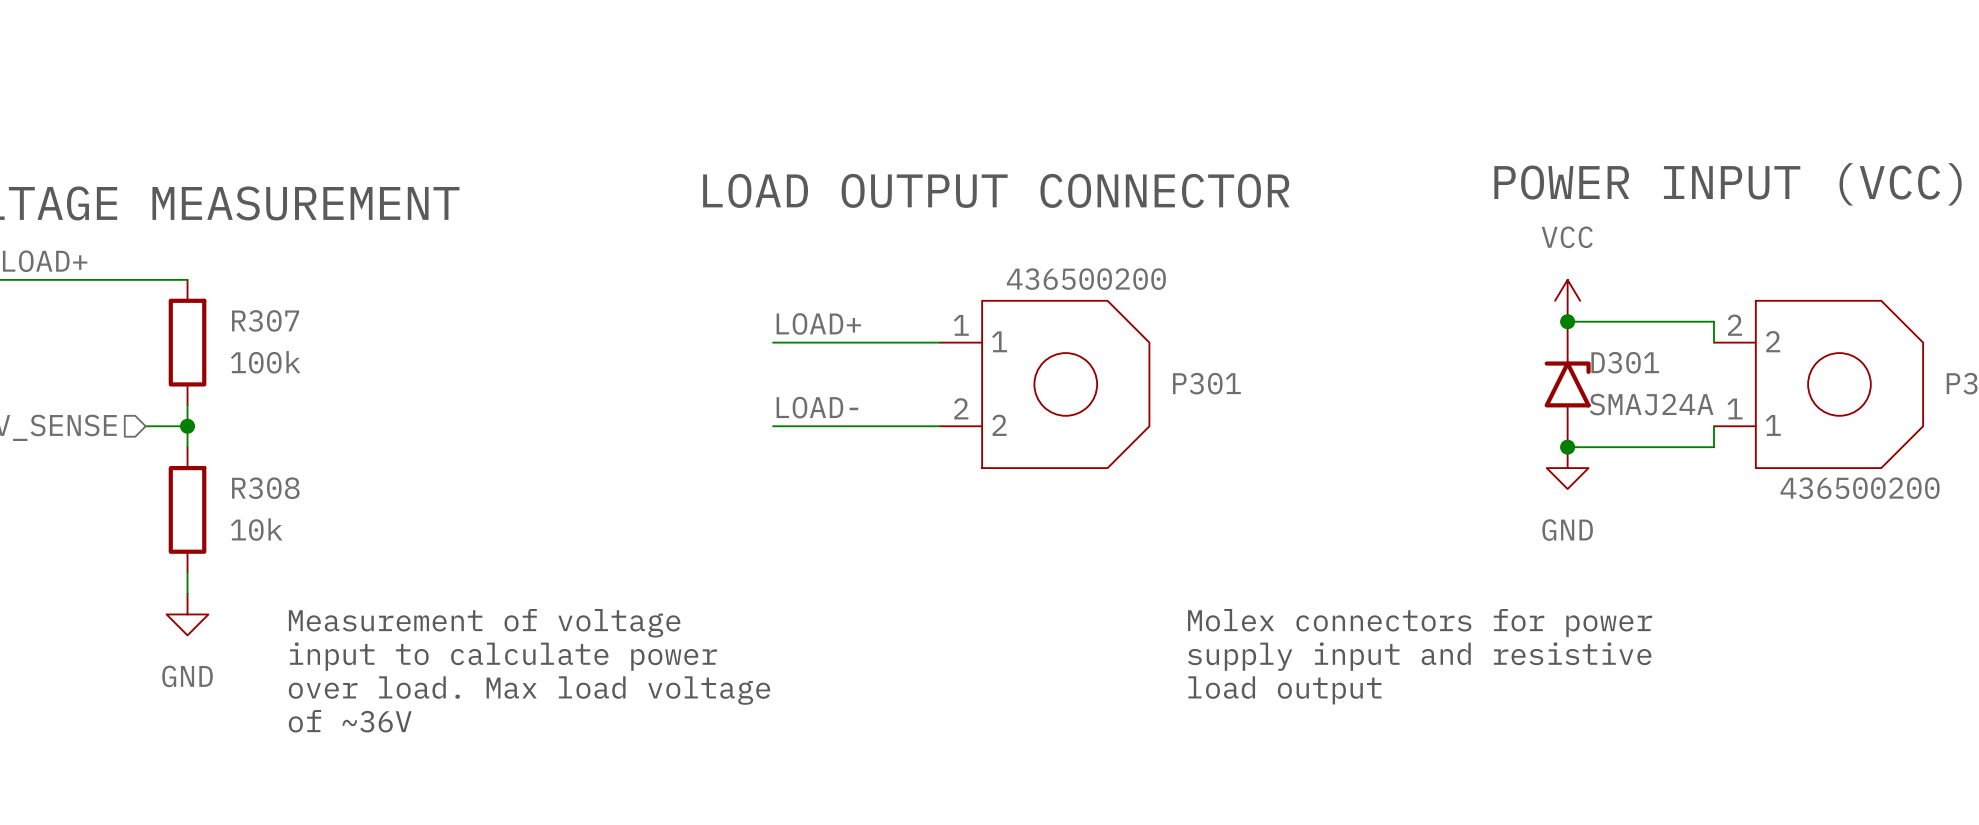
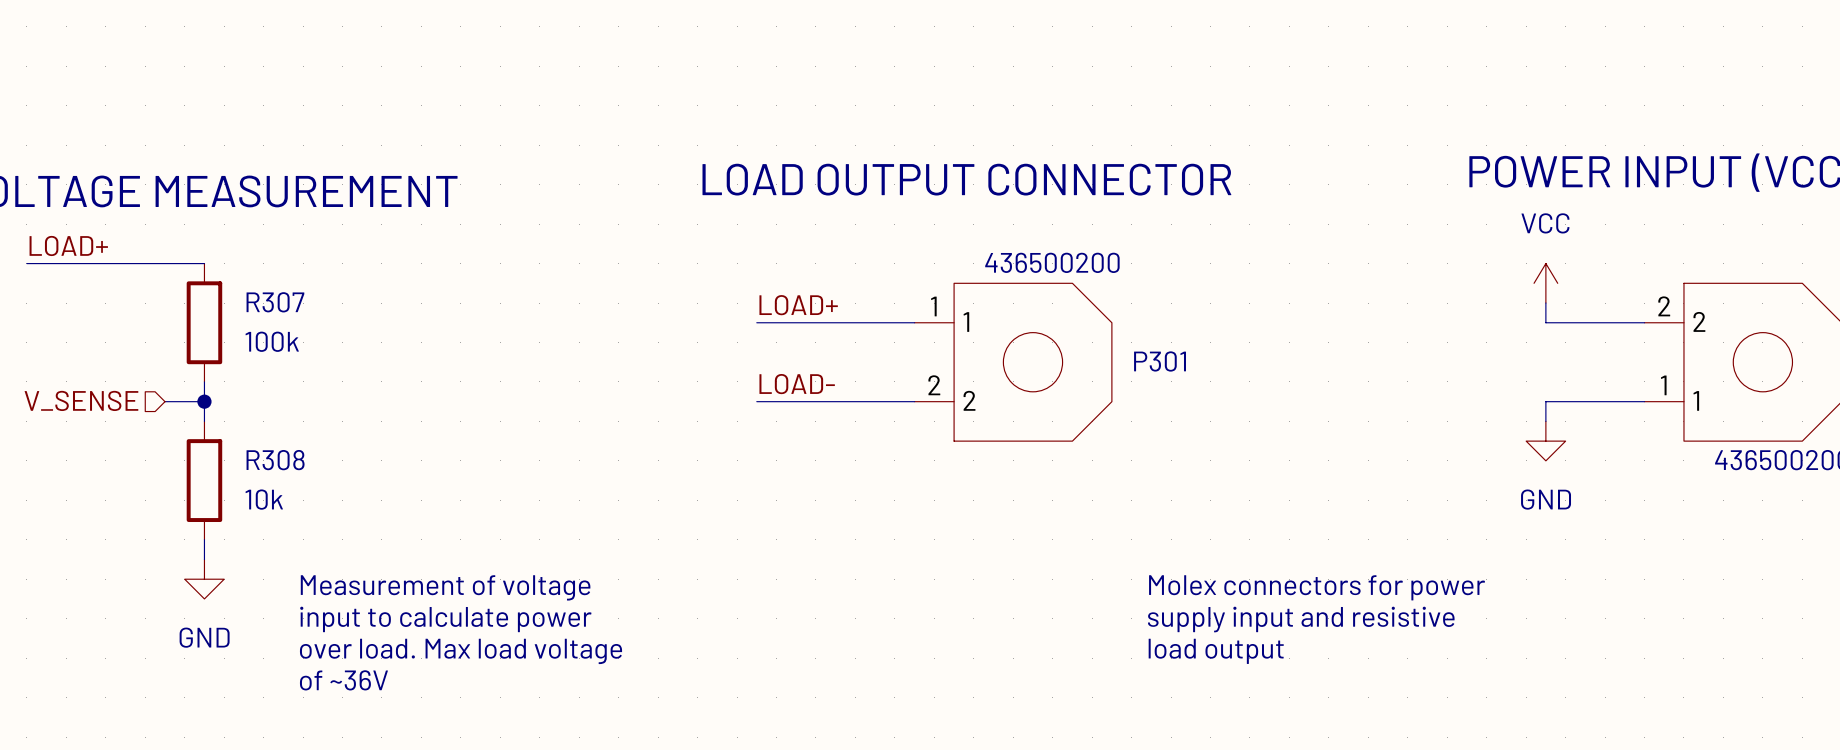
power symbol position: VCC (1567, 300) -> VCC (1545, 283)
wire: (1567, 321) (1714, 321) (1714, 342) -> (1545, 303) (1545, 322) (1644, 322)
junction: (1567, 321) -> none
D301: SMAJ24A (1567, 384) -> none
wire: (1714, 426) (1714, 447) (1567, 447) -> (1644, 401) (1545, 401) (1545, 421)
junction: (1567, 447) -> none
power symbol position: GND (1567, 468) -> GND (1545, 441)

